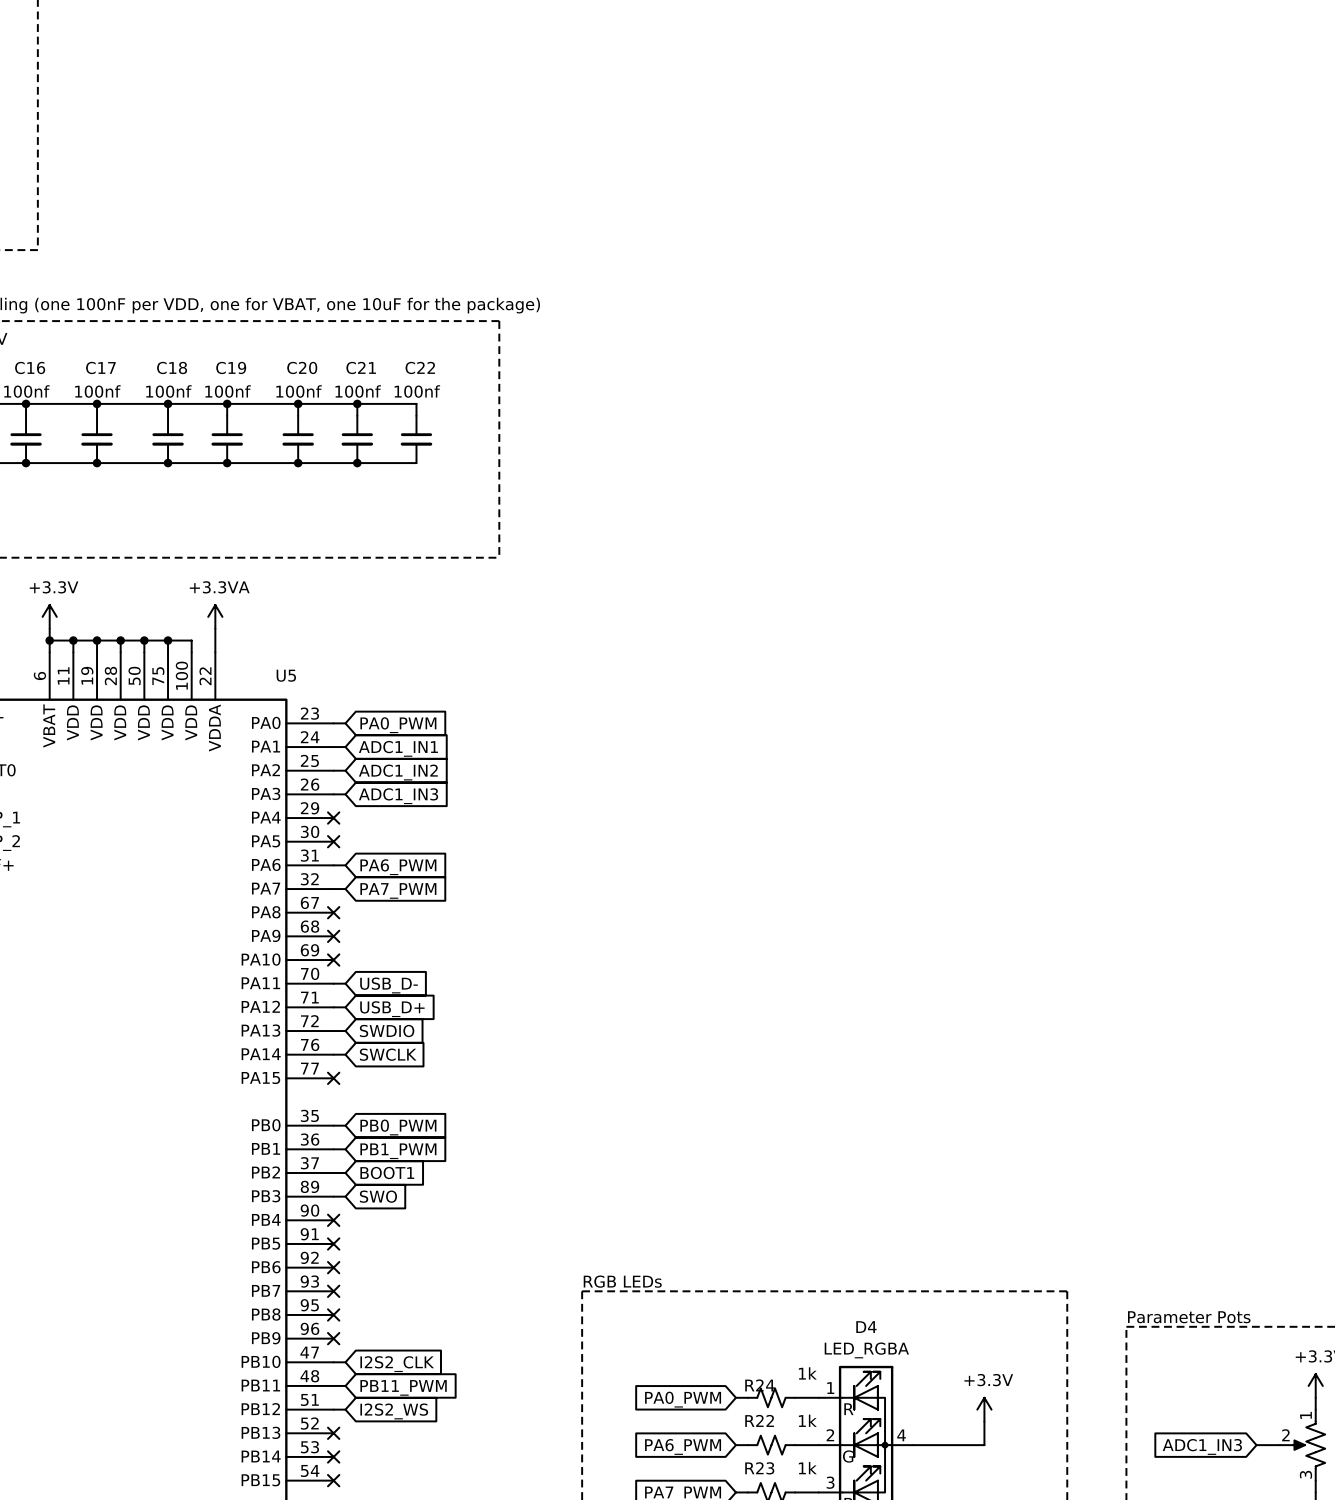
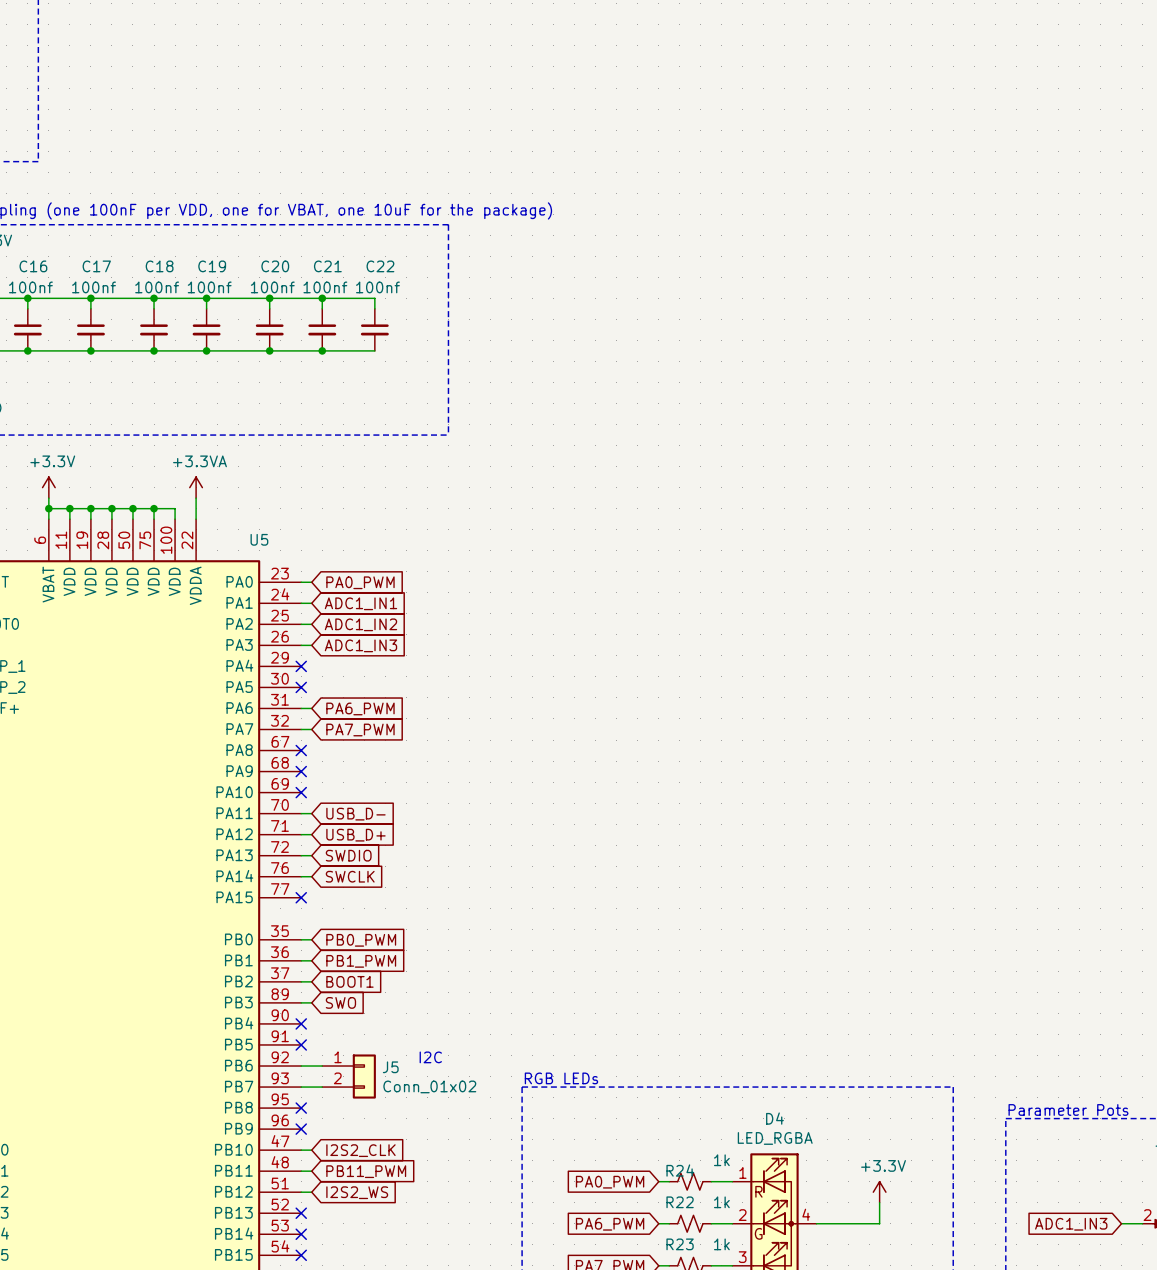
text: none -> I2C (430, 1057)
wire: none -> (301, 1066) (322, 1066)
no-connect mark: (333, 1267) -> none
J5: none -> Conn_01x02 (349, 1076)
wire: none -> (301, 1087) (322, 1087)
no-connect mark: (333, 1291) -> none

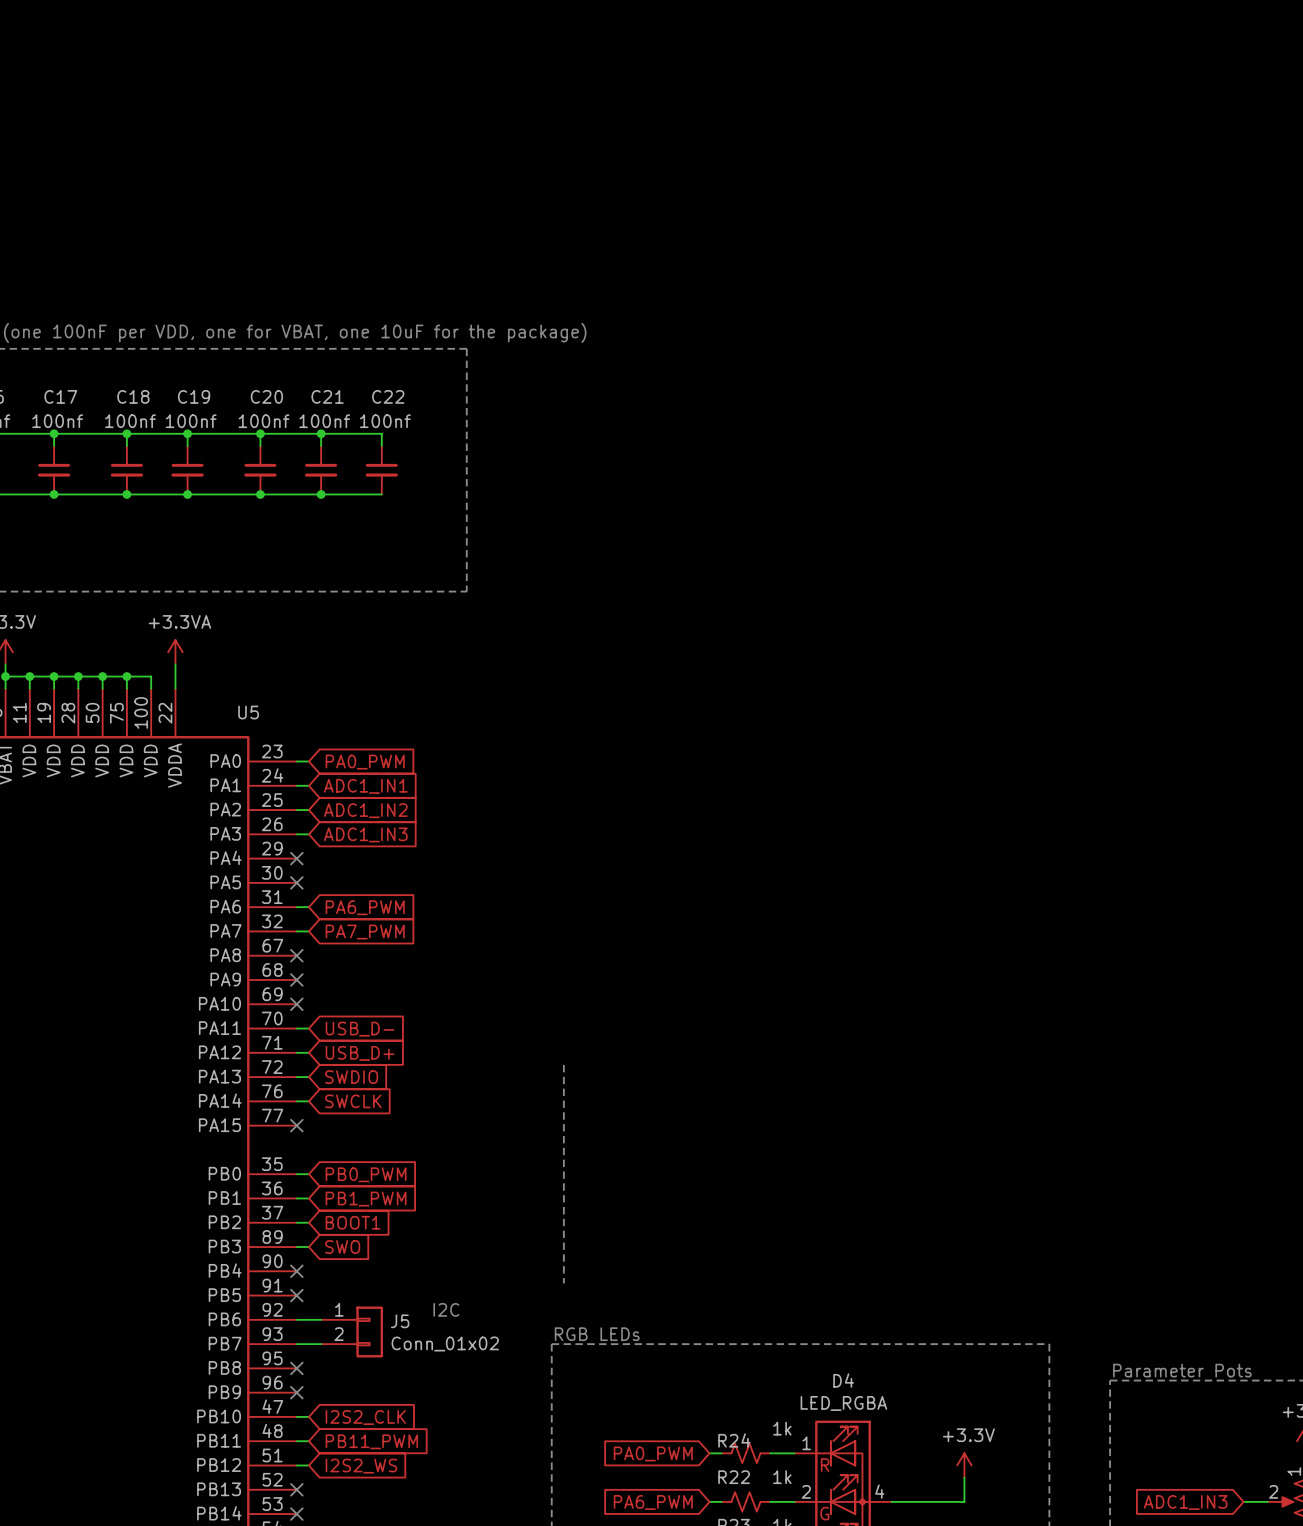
line: none -> (563, 1064) (563, 1283)

